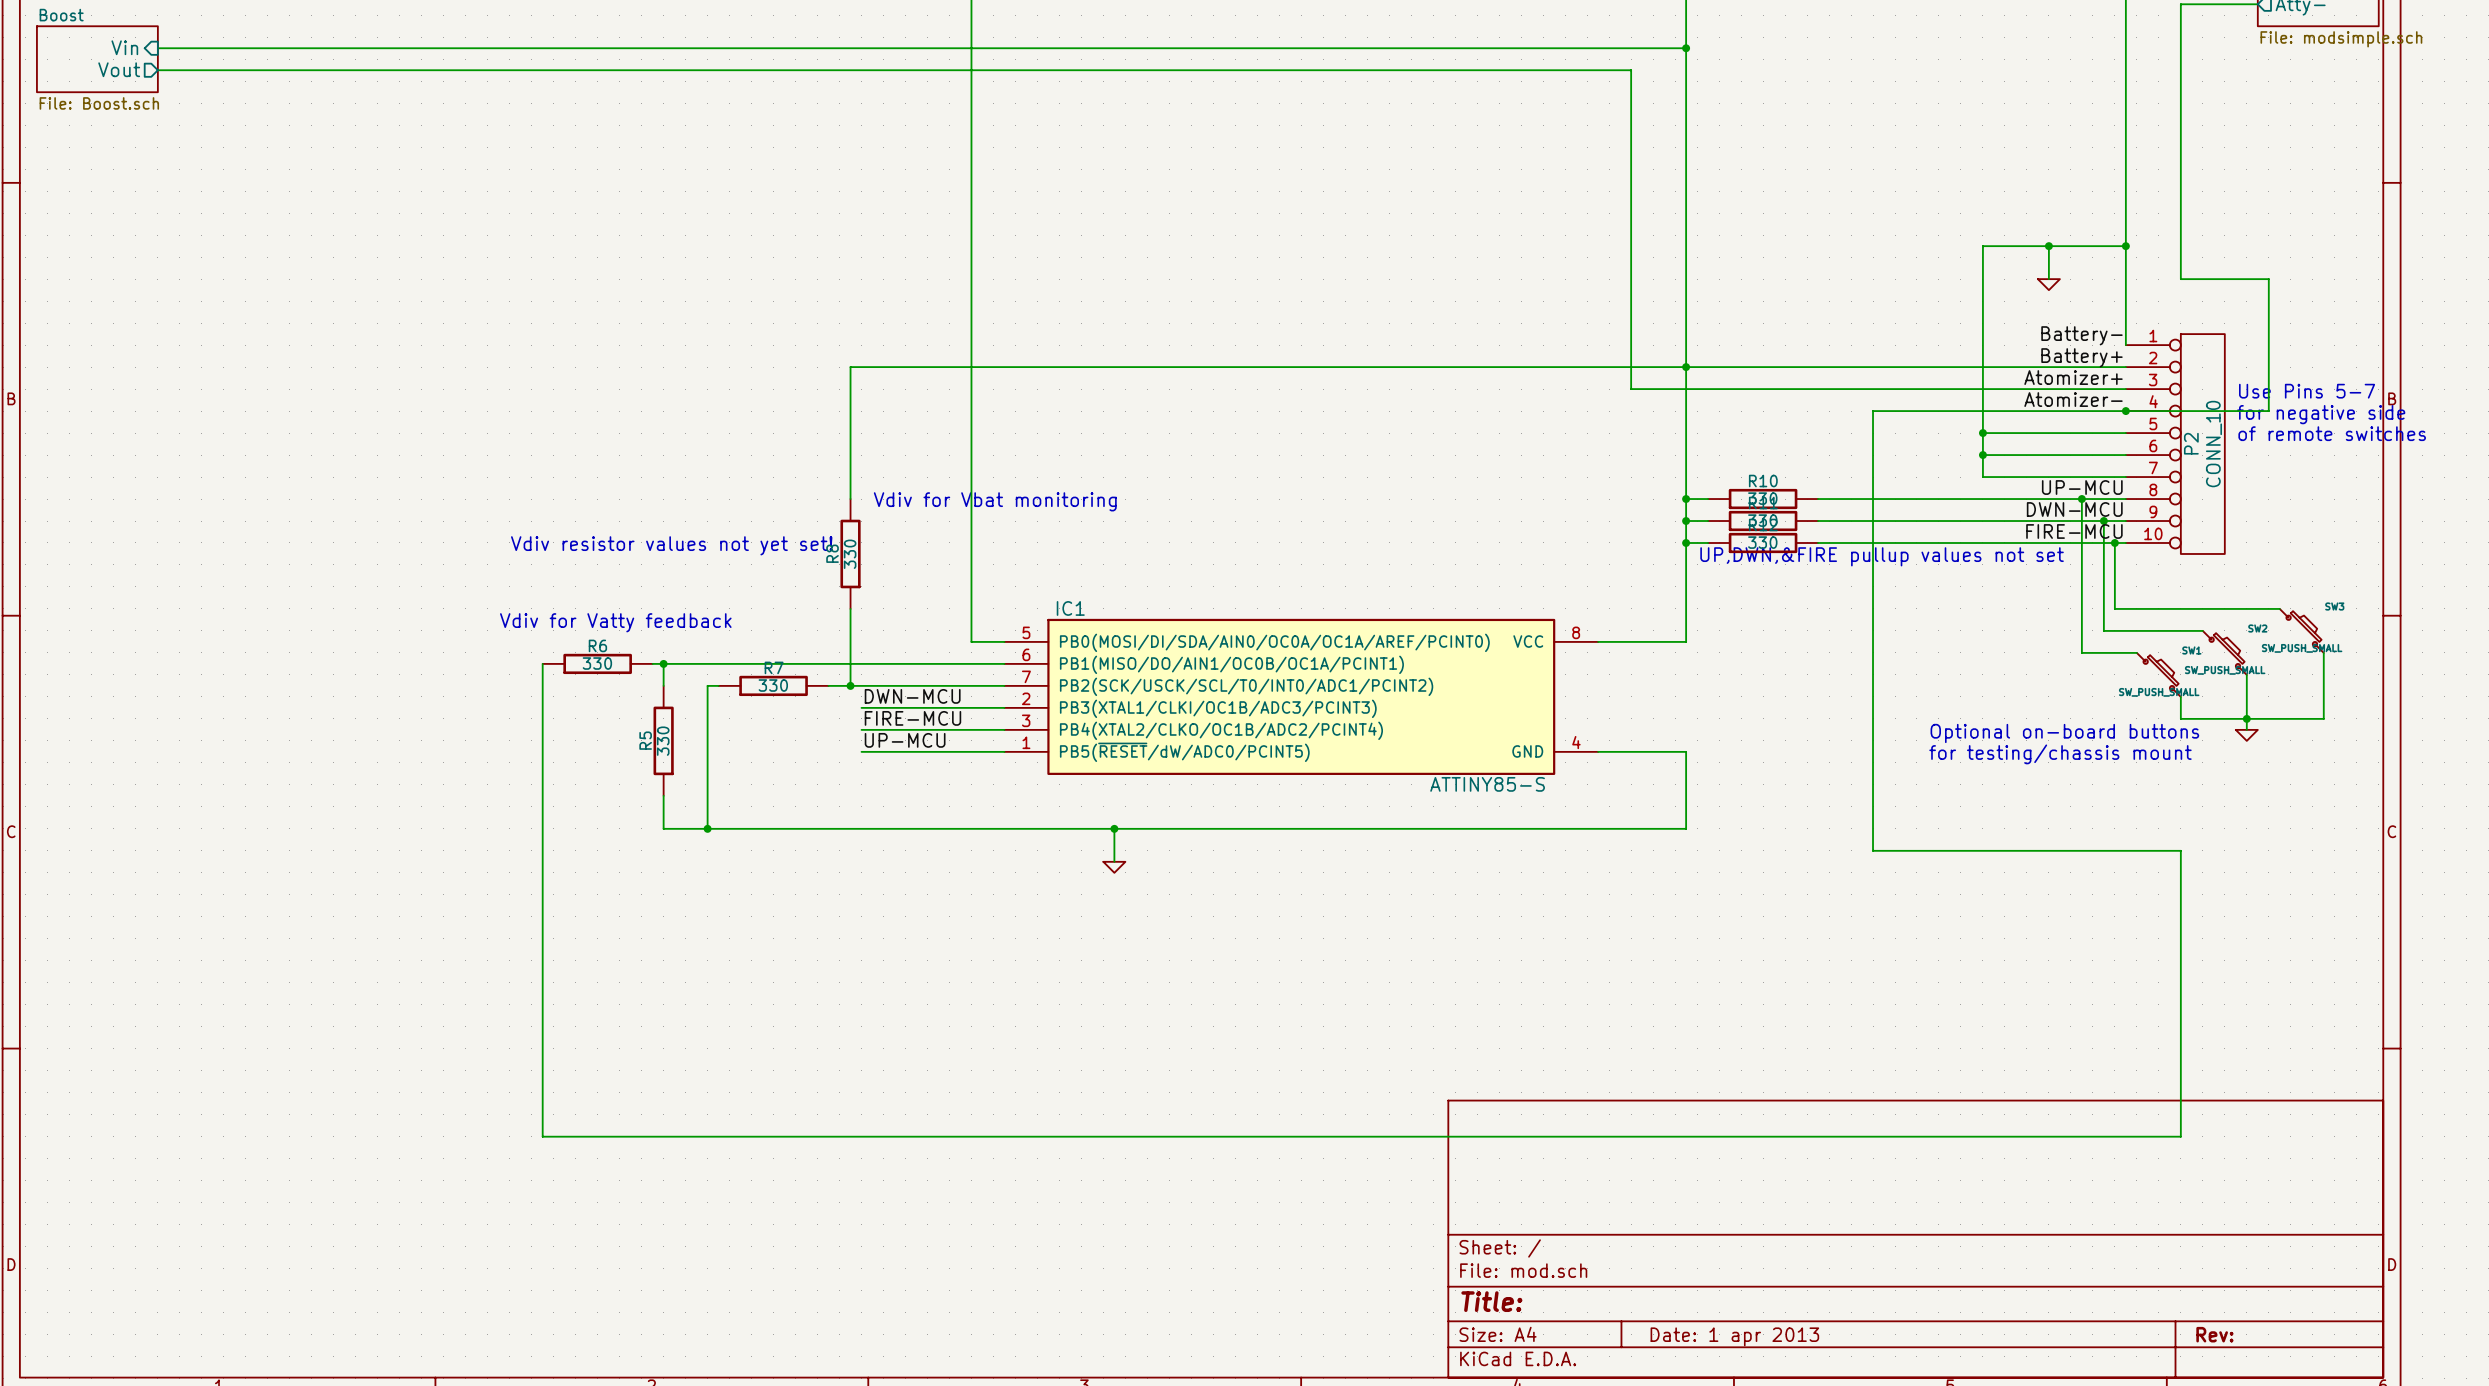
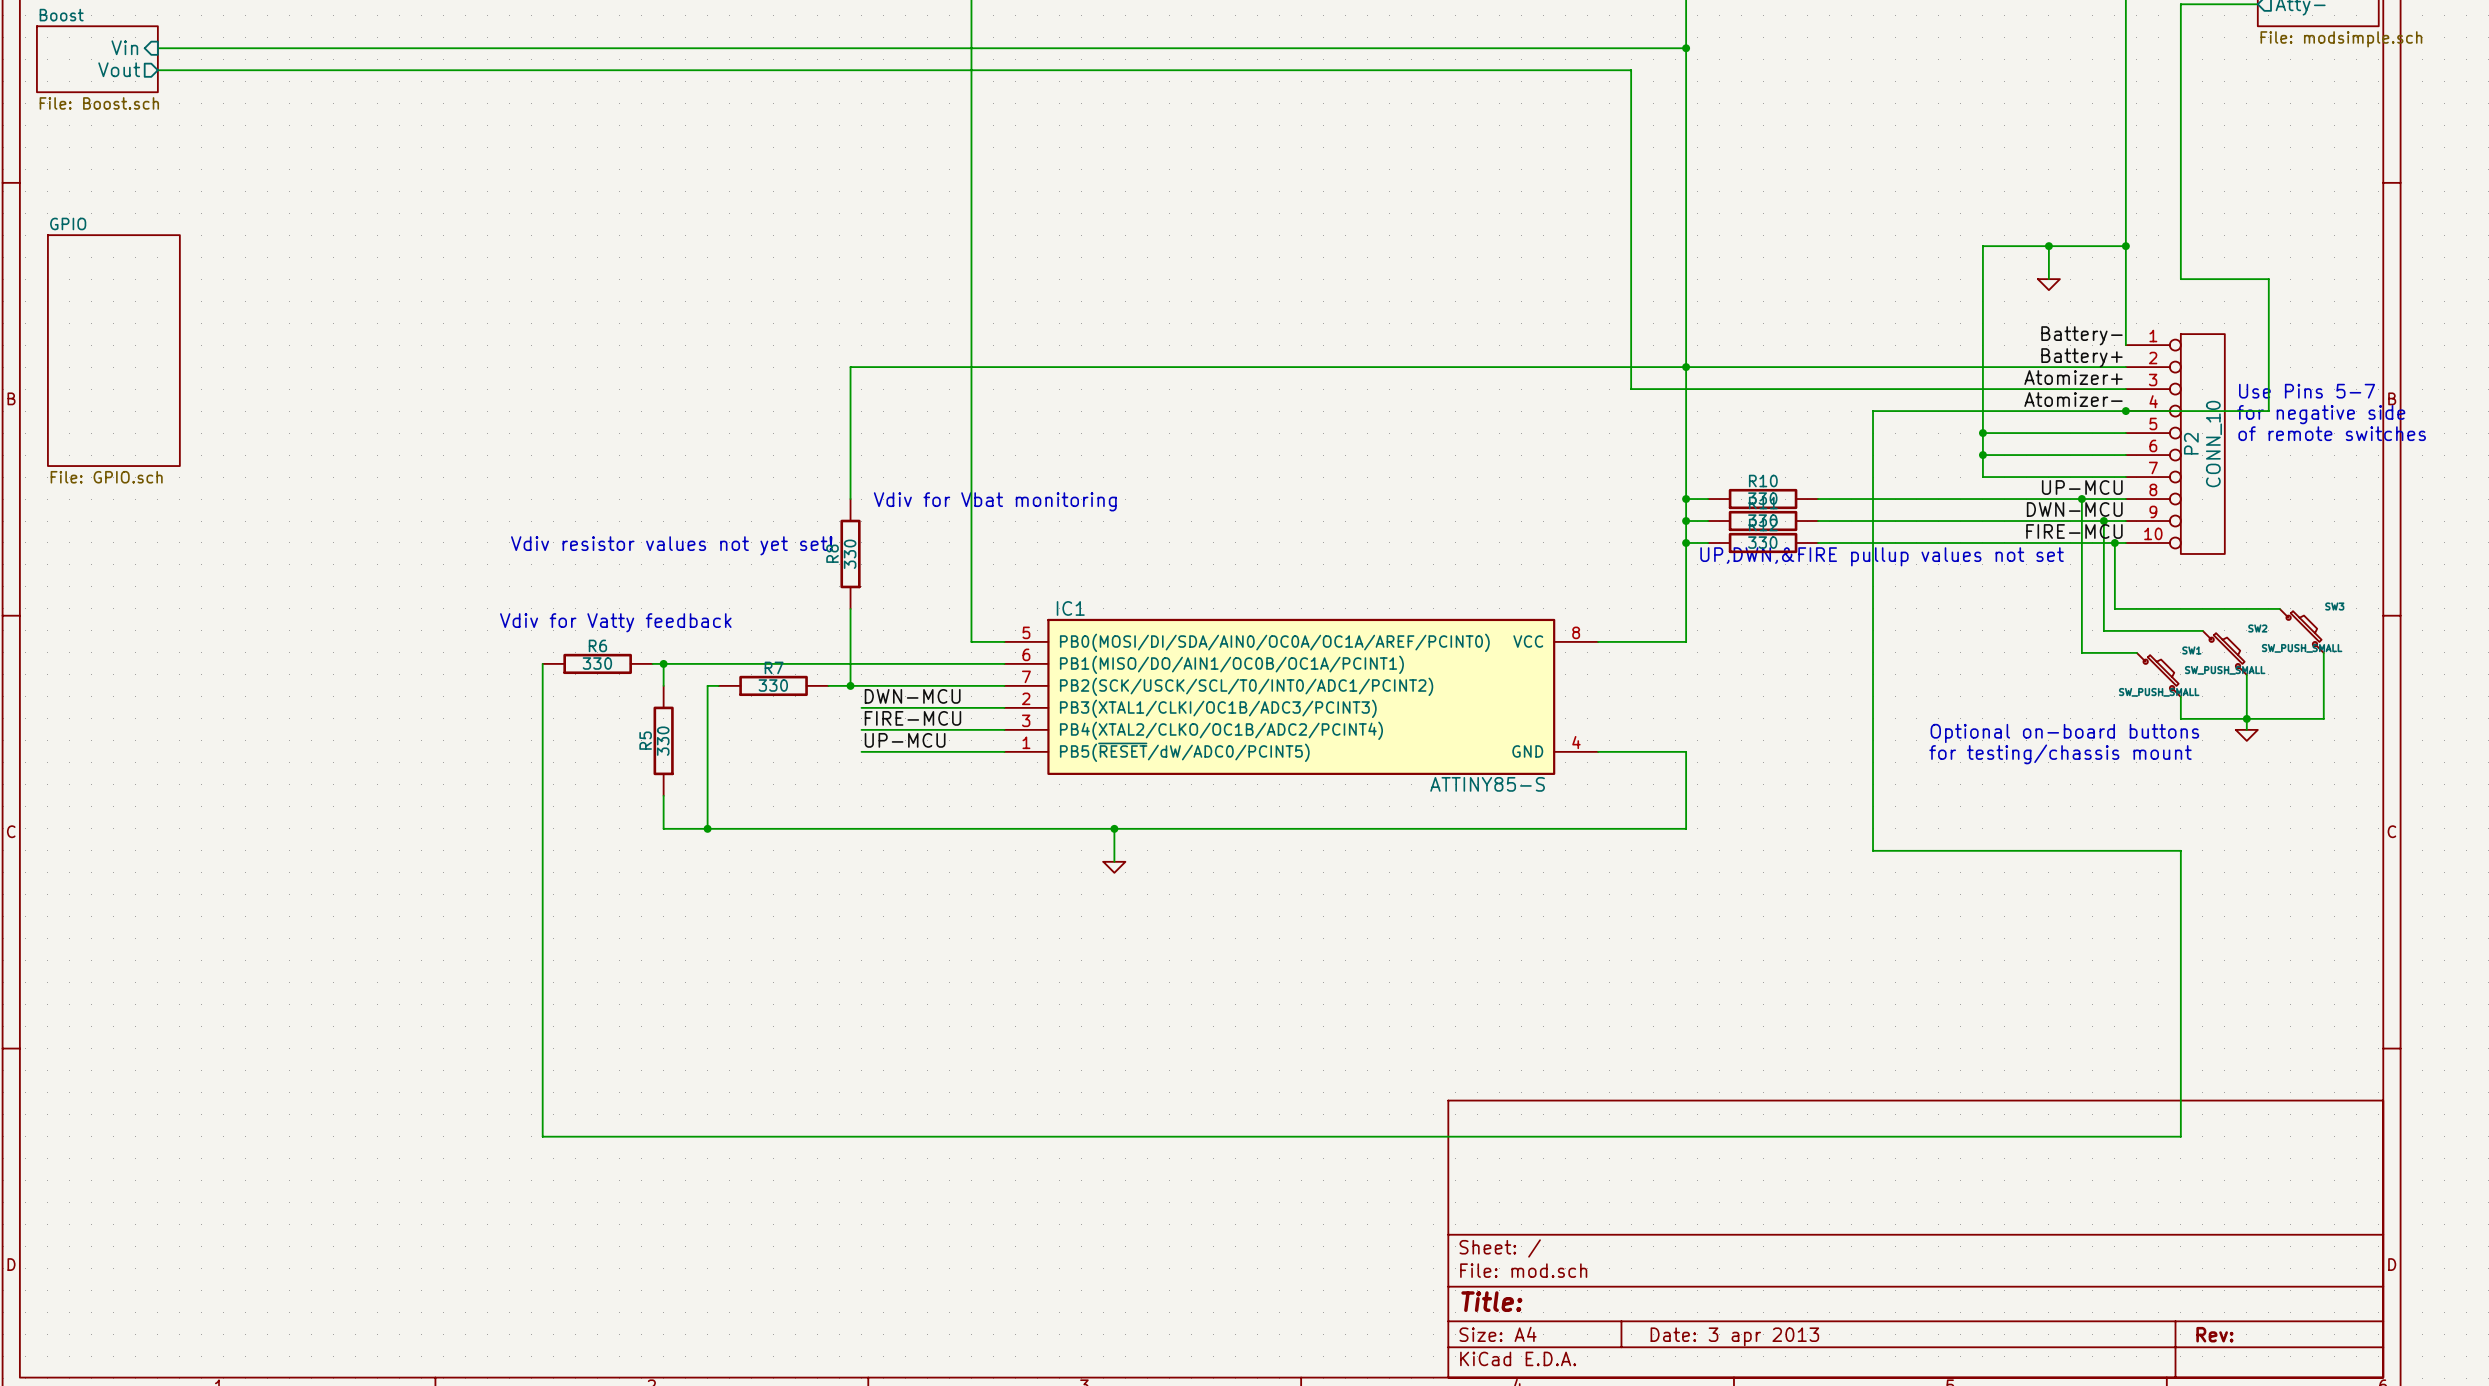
sheet GPIO: none -> File: GPIO.sch (113, 350)
title block: Date: 1 apr 2013 (1734, 1336) -> Date: 3 apr 2013 (1734, 1336)

